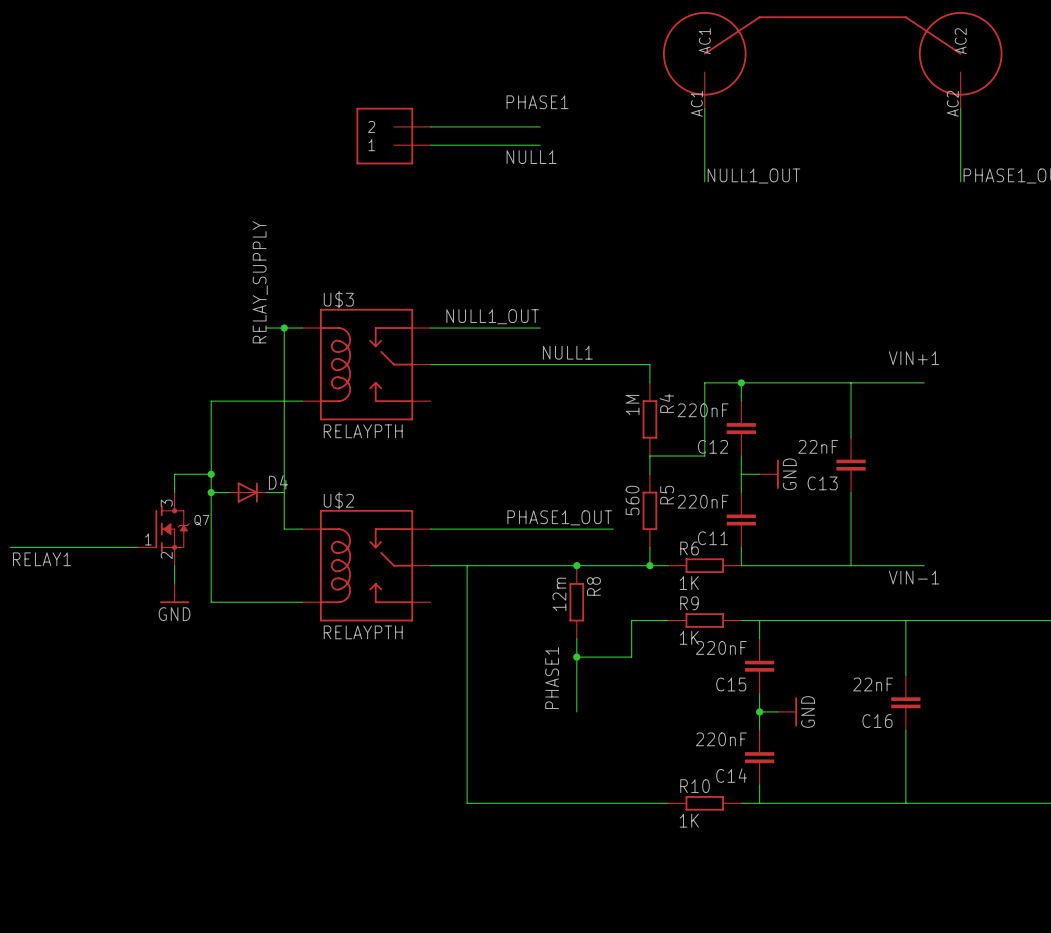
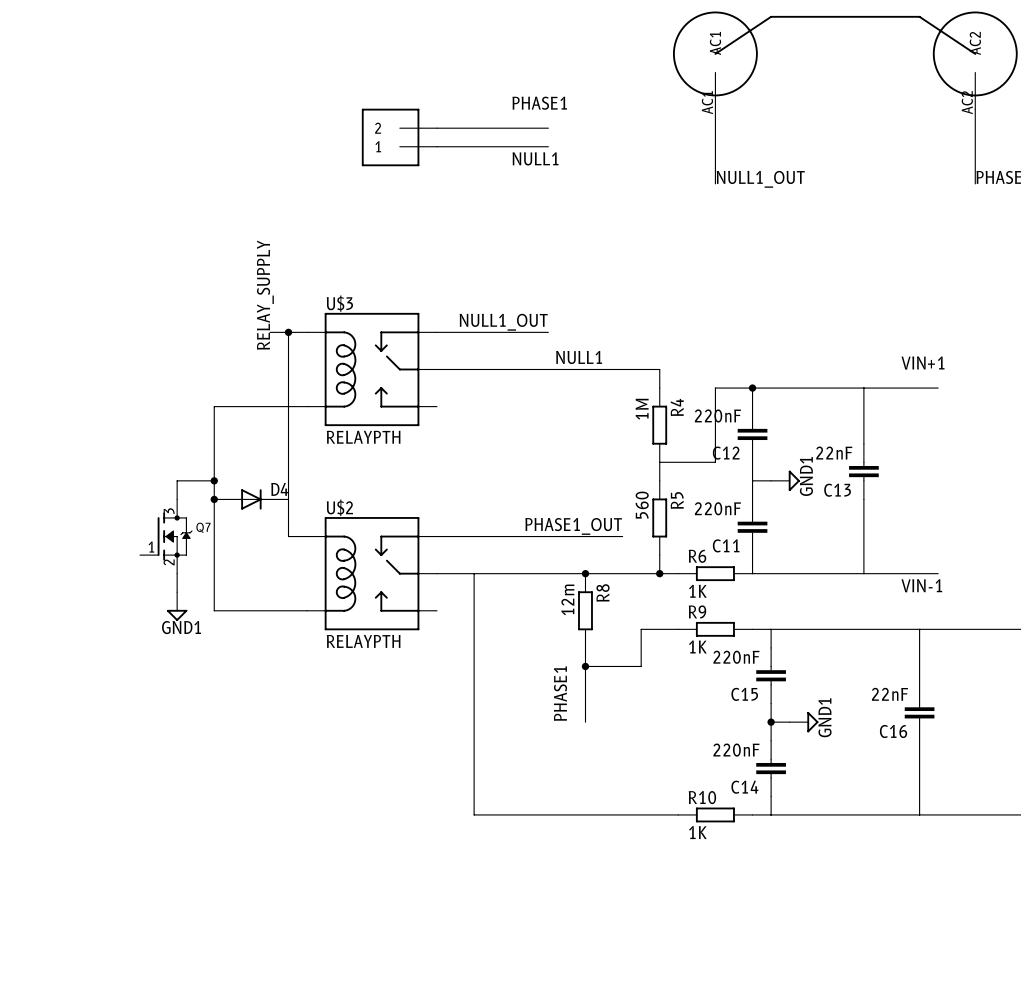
power symbol: GND (769, 474) -> GND1 (785, 480)
wire: (10, 547) (138, 547) -> none
label: RELAY1 (42, 559) -> none
power symbol: GND (174, 593) -> GND1 (177, 606)
power symbol: GND (787, 711) -> GND1 (804, 722)

